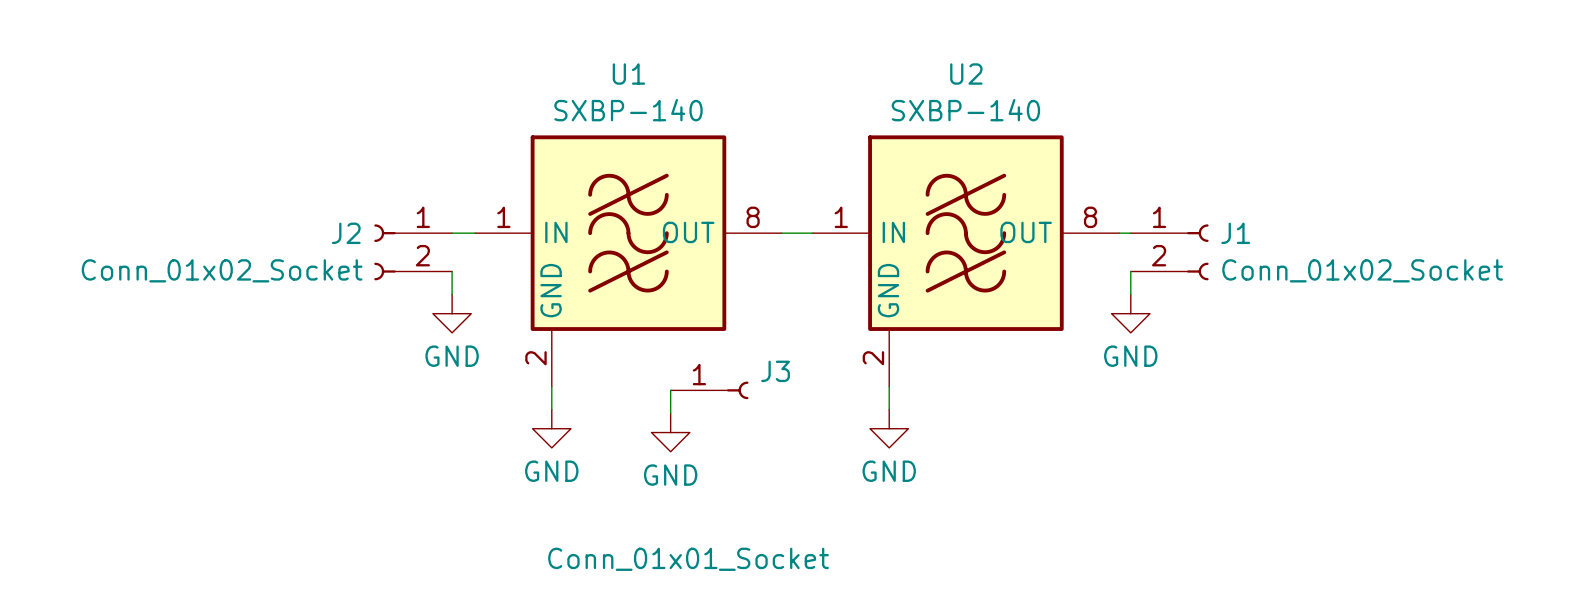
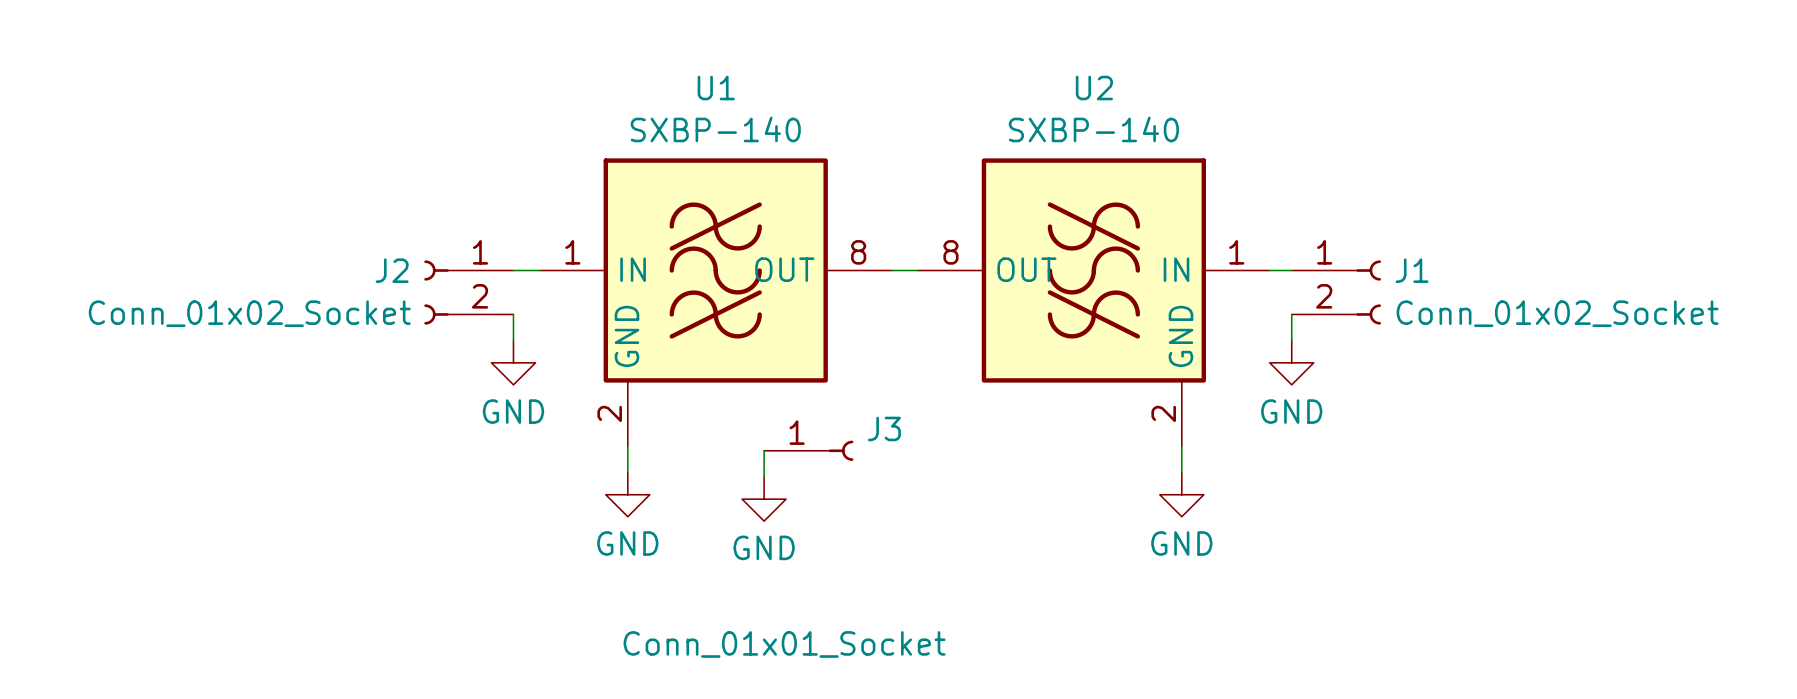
U2 flip: as is (965, 233) -> left-right (1093, 270)
wire: (889, 386) (889, 409) -> (1181, 446) (1181, 472)
power symbol position: GND (889, 428) -> GND (1181, 494)

